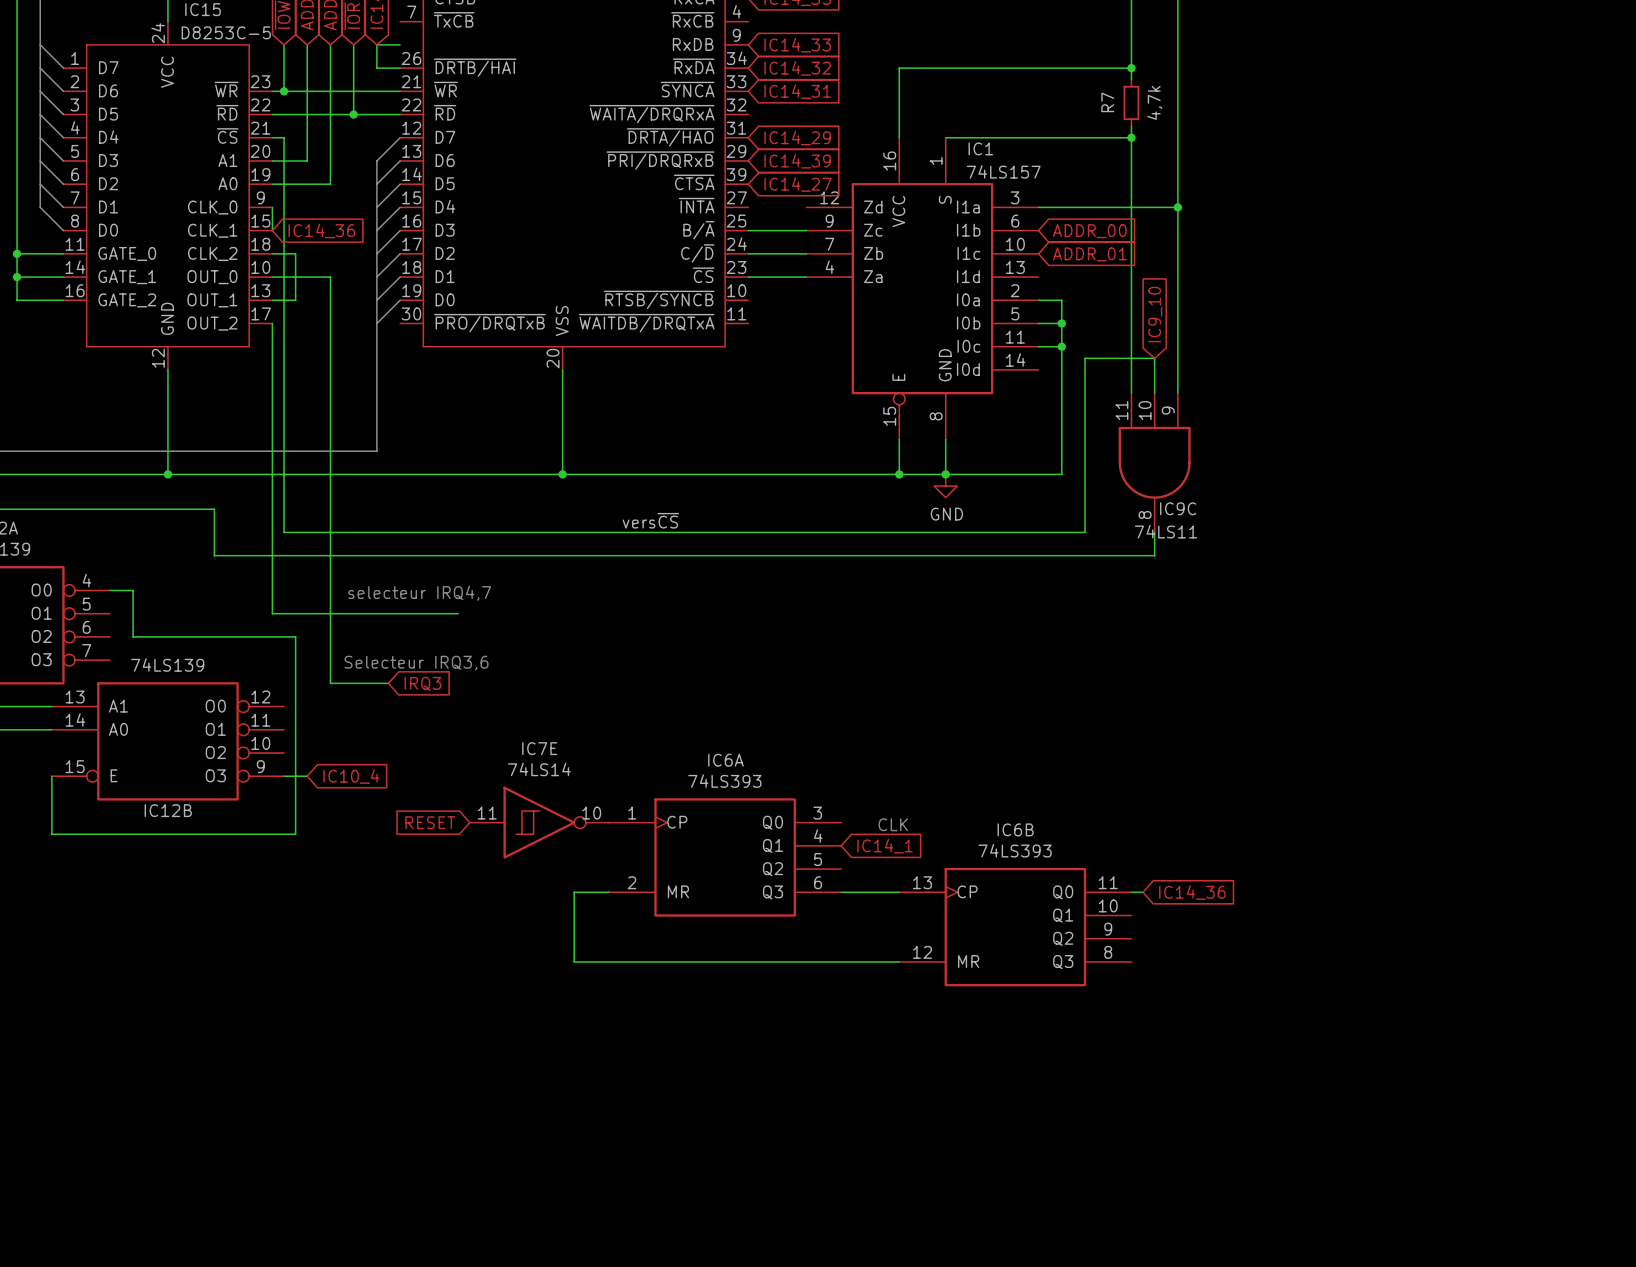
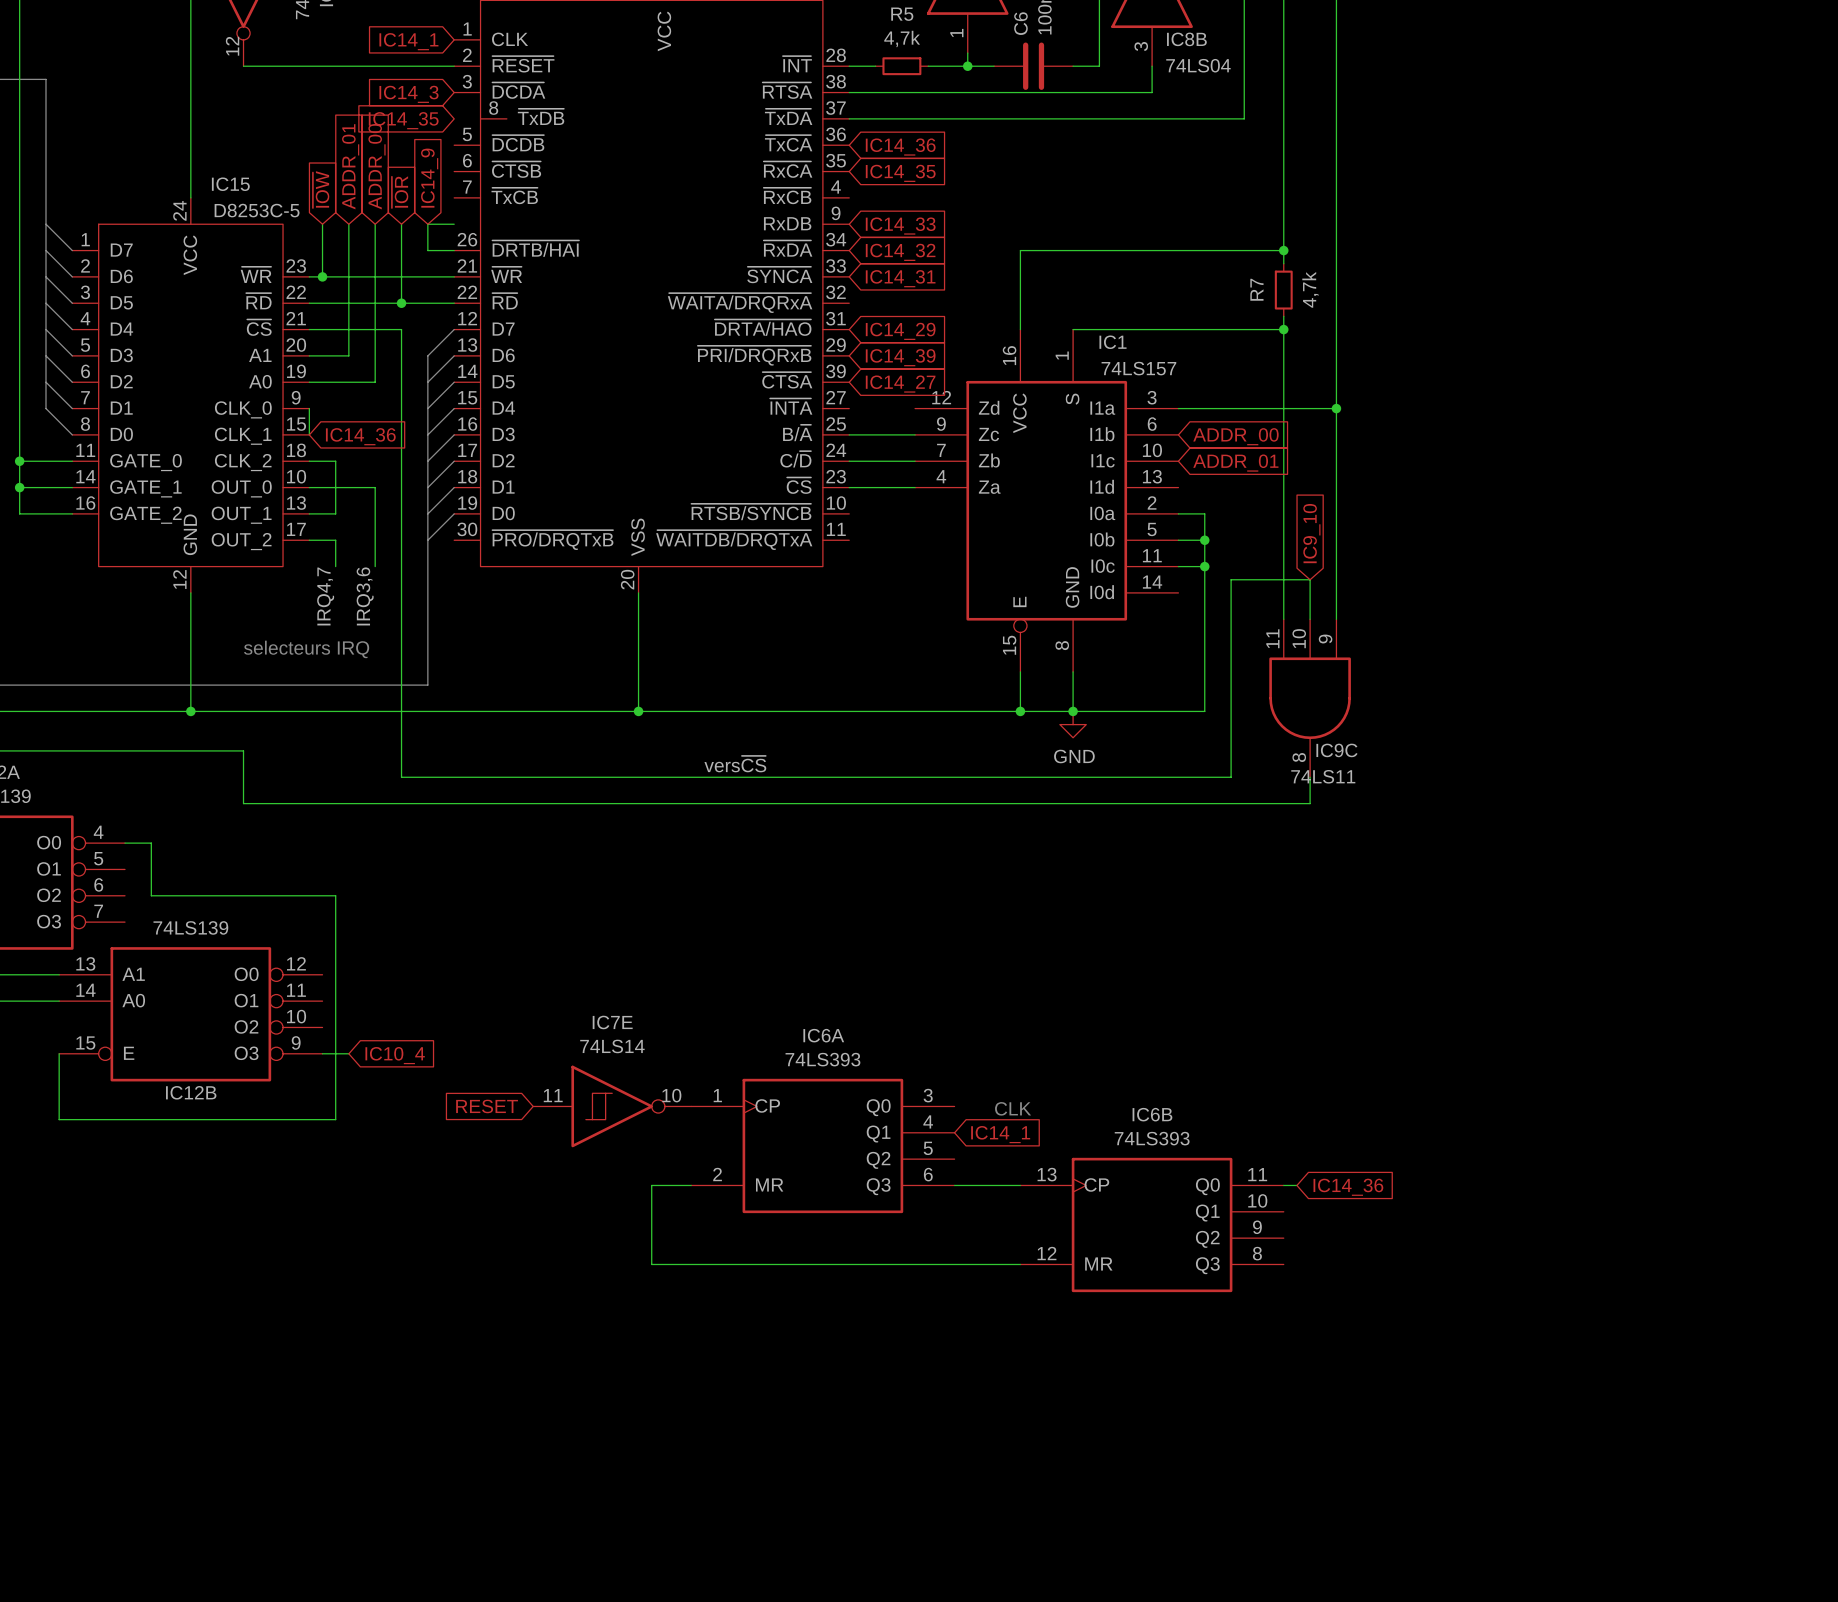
wire: (284, 137) (284, 532) (353, 532) -> (322, 329) (401, 329) (401, 777)
wire: (272, 323) (272, 613) (458, 613) -> (309, 540) (335, 540) (335, 566)
wire: (330, 346) (330, 683) (388, 683) -> none
label: none -> IRQ4,7 (325, 596)
label: none -> IRQ3,6 (365, 596)
text: none -> selecteurs IRQ (306, 649)
text: selecteur IRQ4,7 (419, 593) -> none
text: Selecteur IRQ3,6 (416, 663) -> none
global label: IRQ3 (422, 683) -> none

